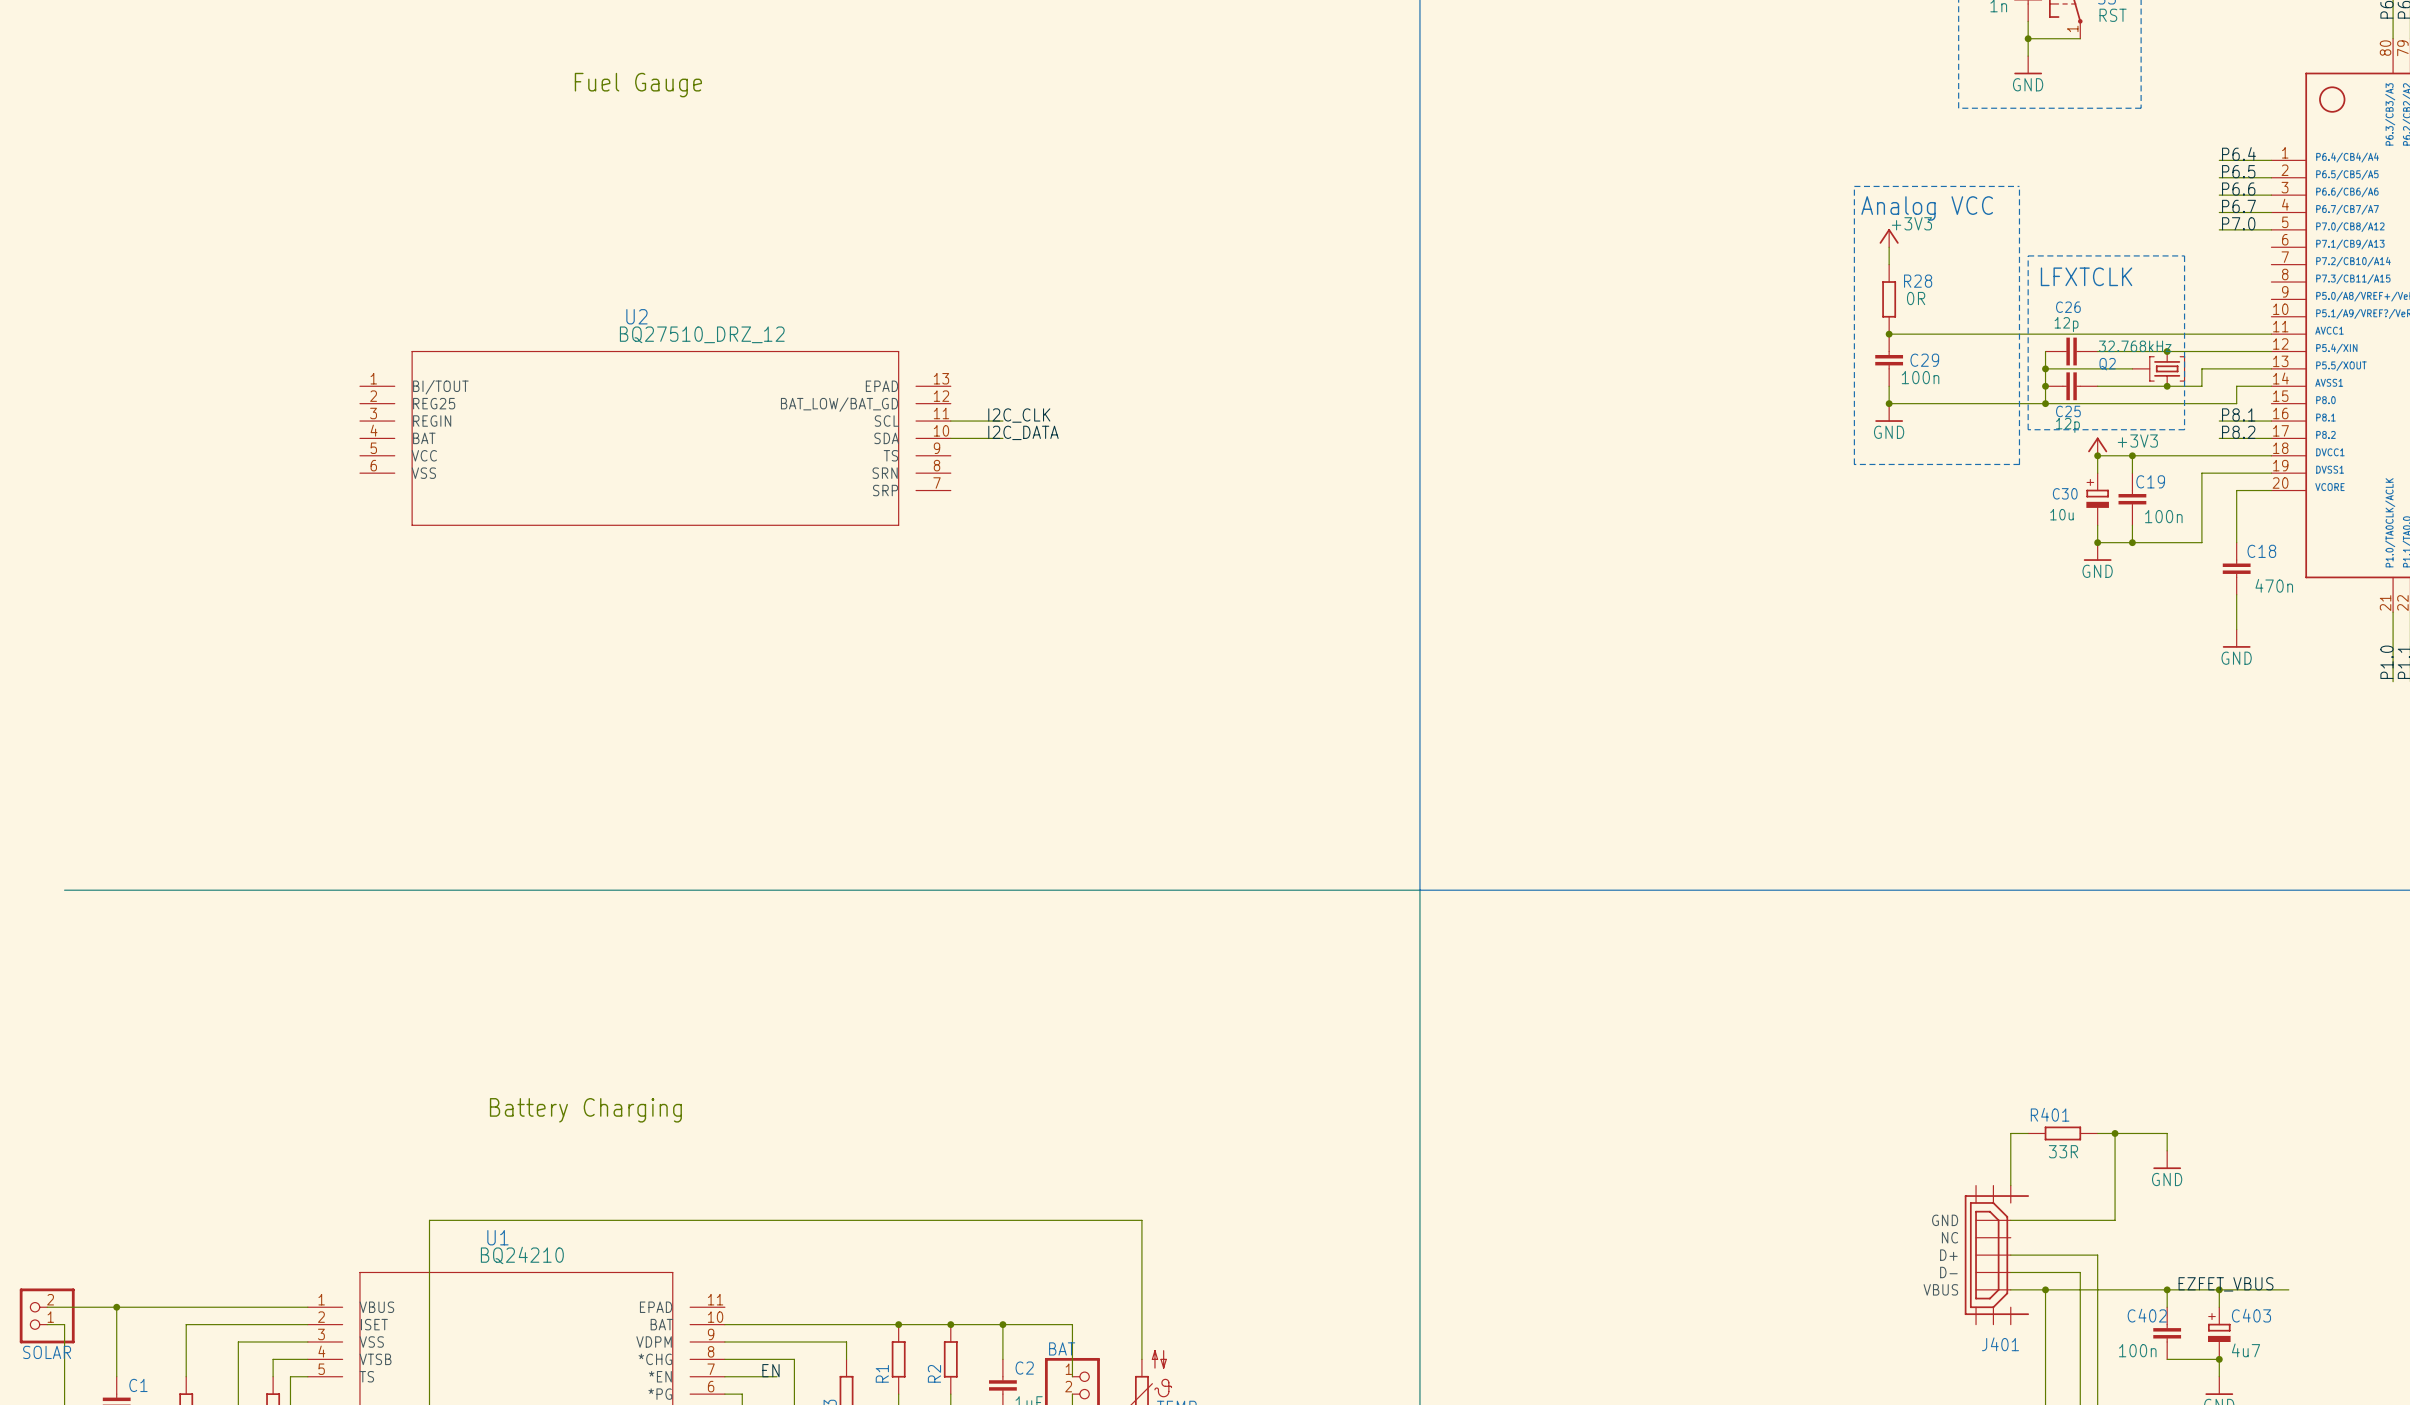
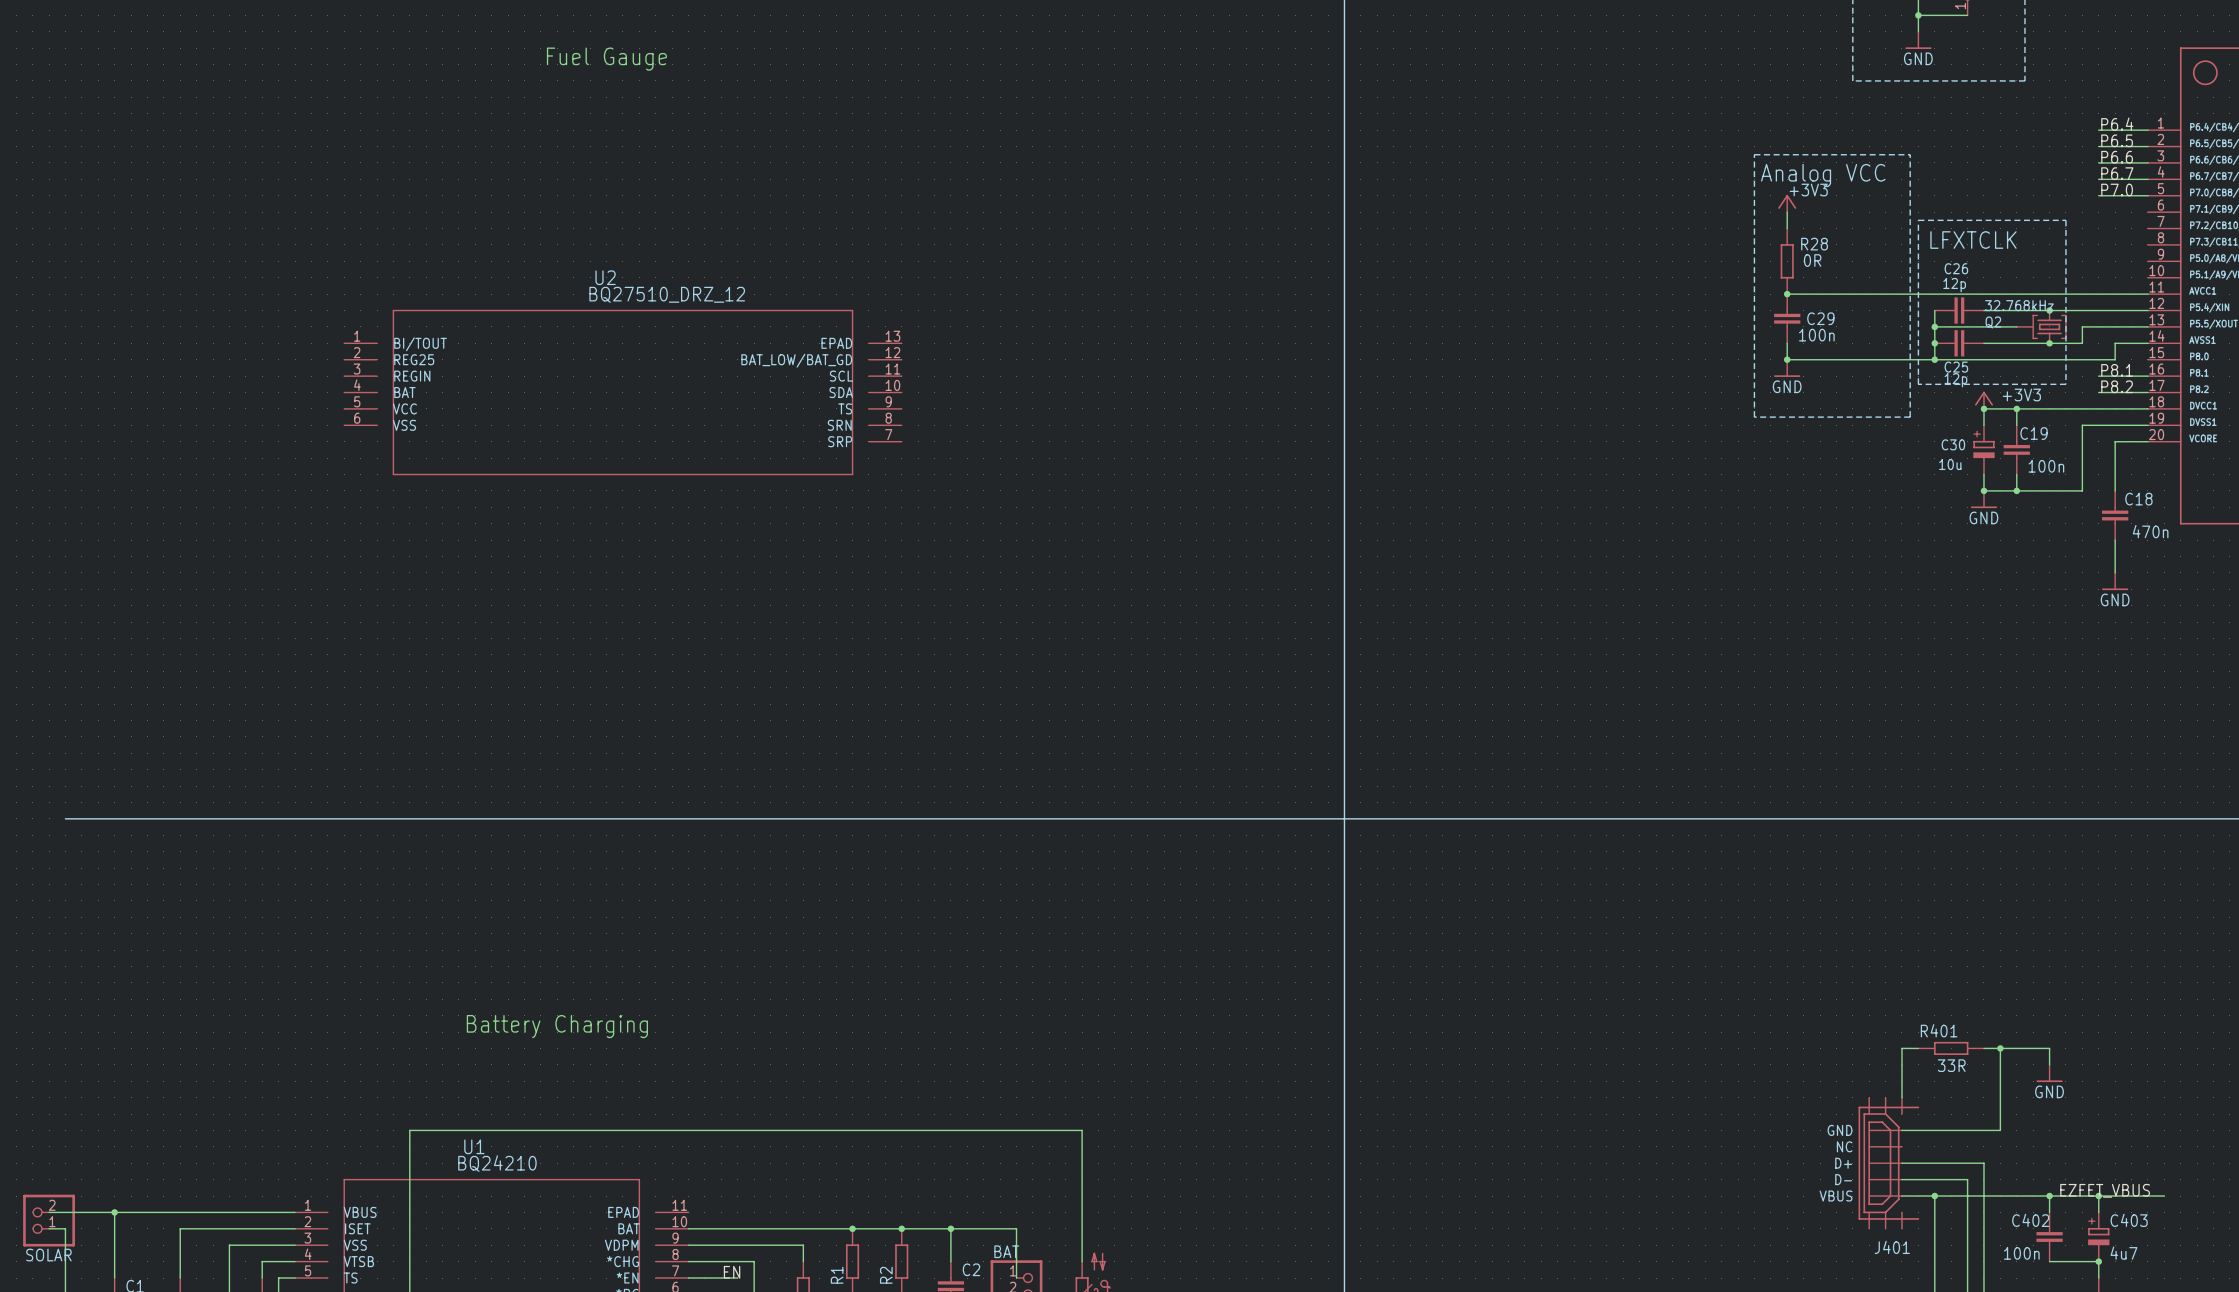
label: I2C_CLK (1019, 415) -> none
wire: (950, 421) (1002, 421) -> none
label: I2C_DATA (1023, 432) -> none
wire: (950, 438) (1002, 438) -> none

